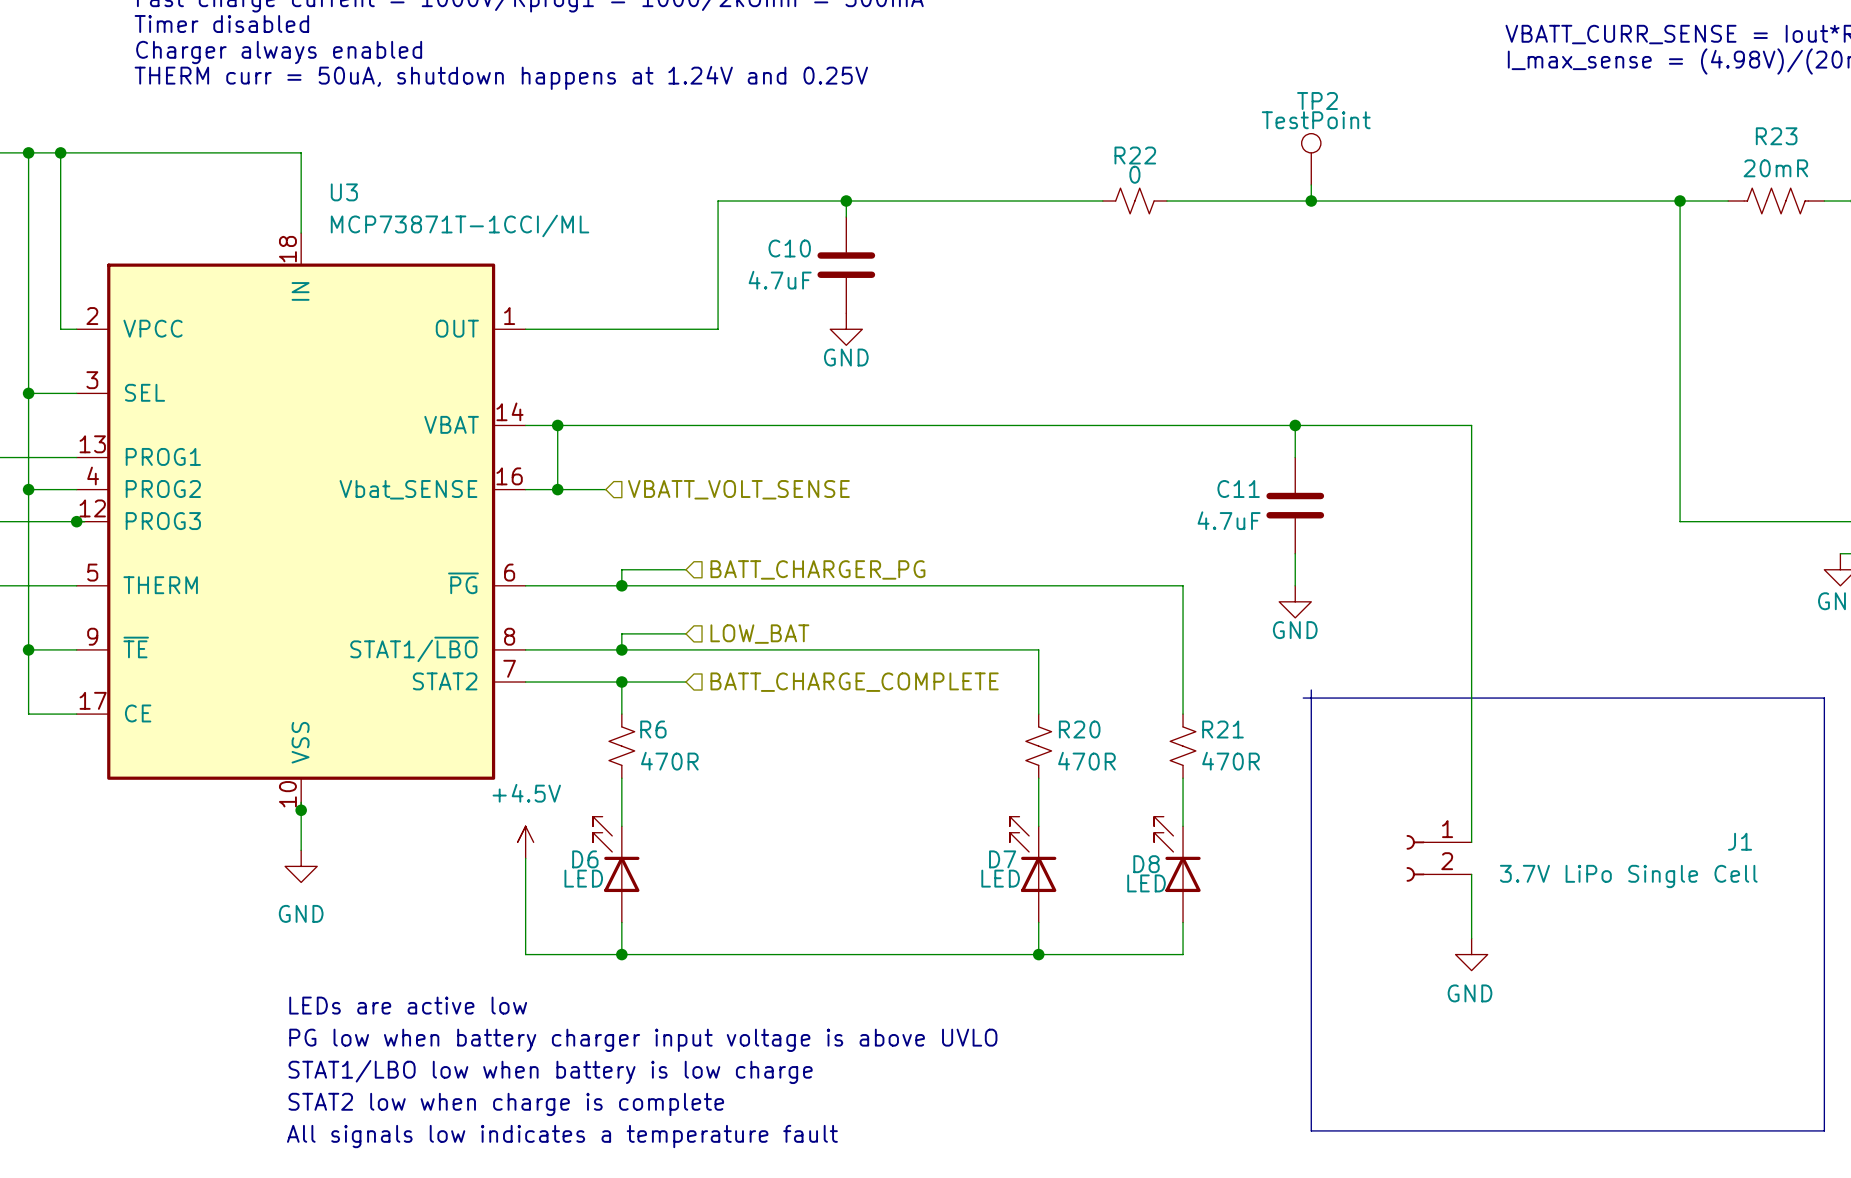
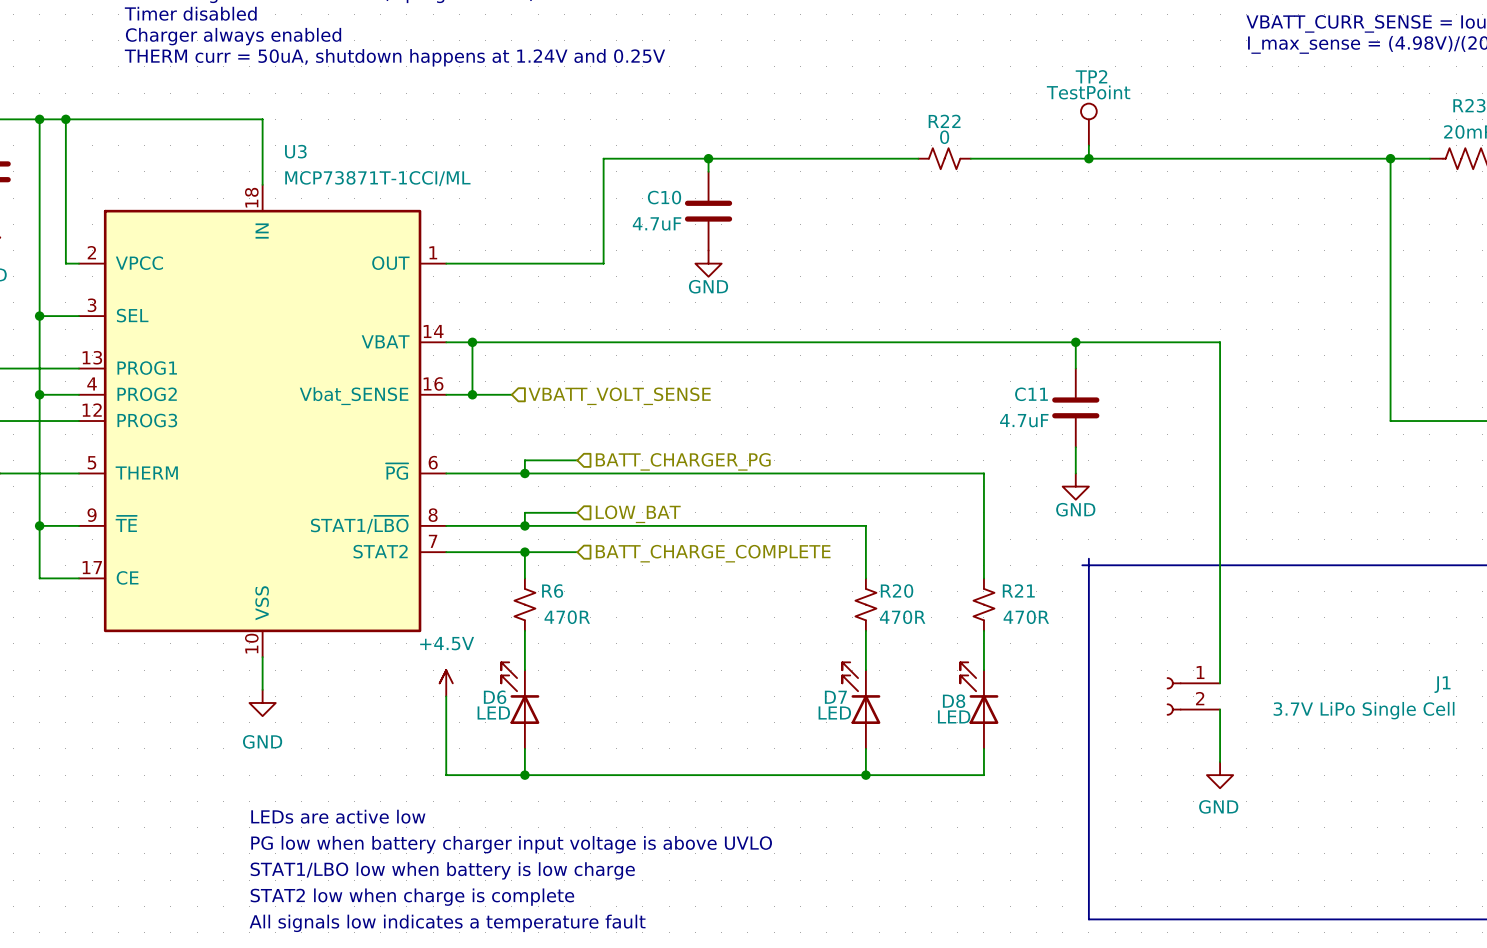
junction: (76, 521) -> none
junction: (301, 810) -> none

